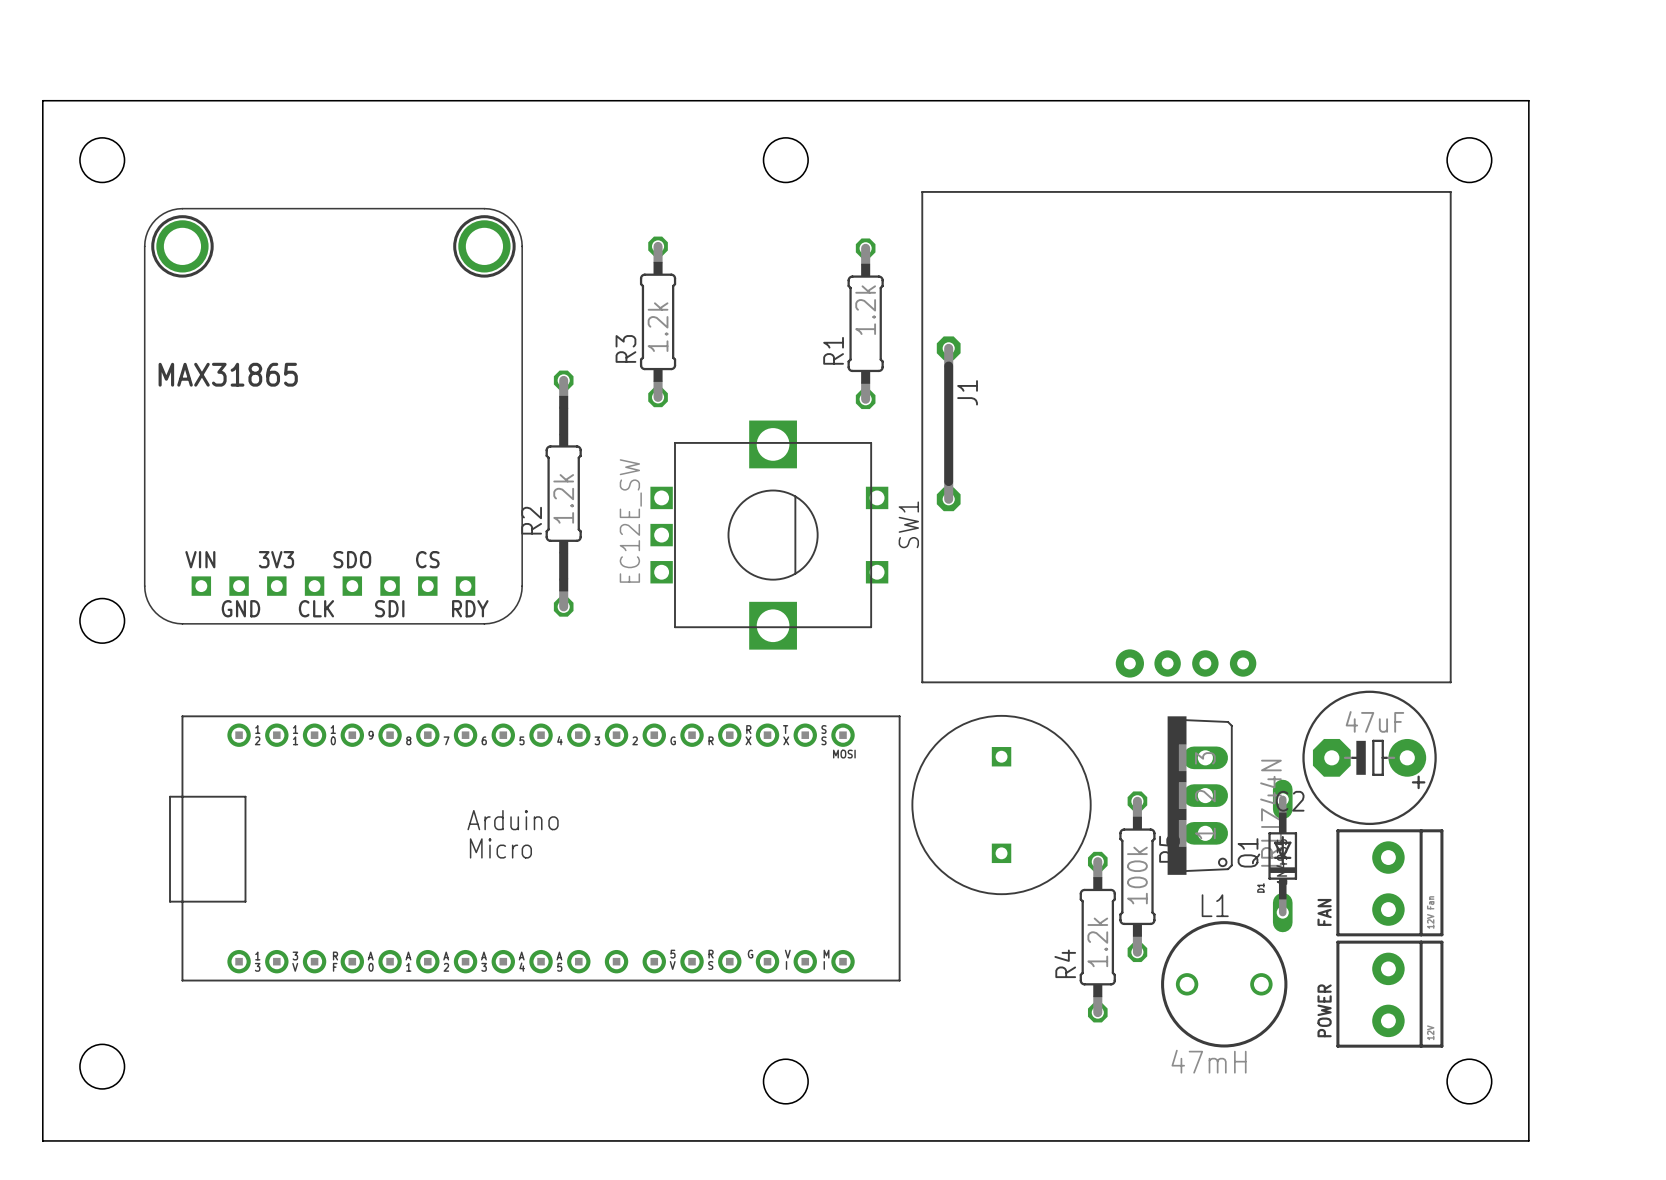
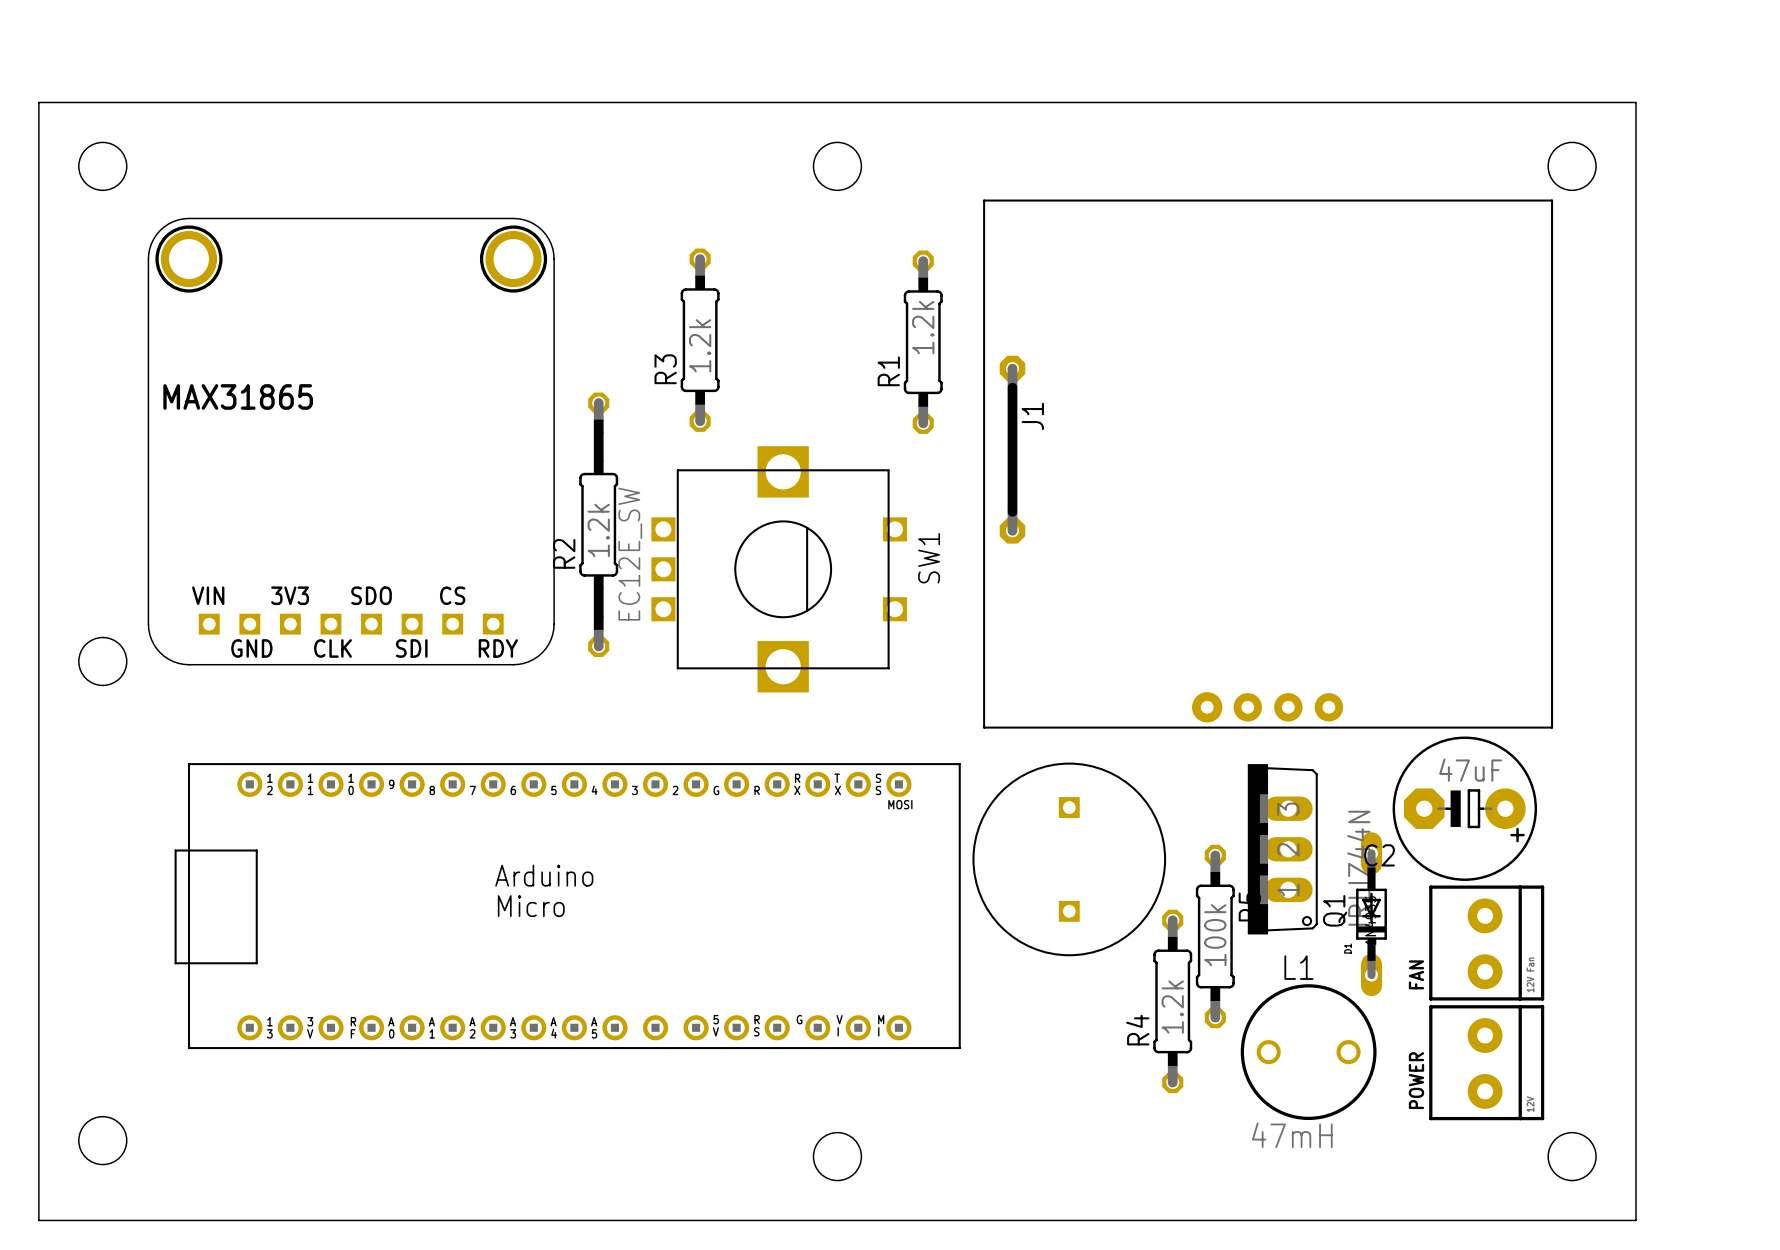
SW1 position: (769, 535) -> (779, 569)

